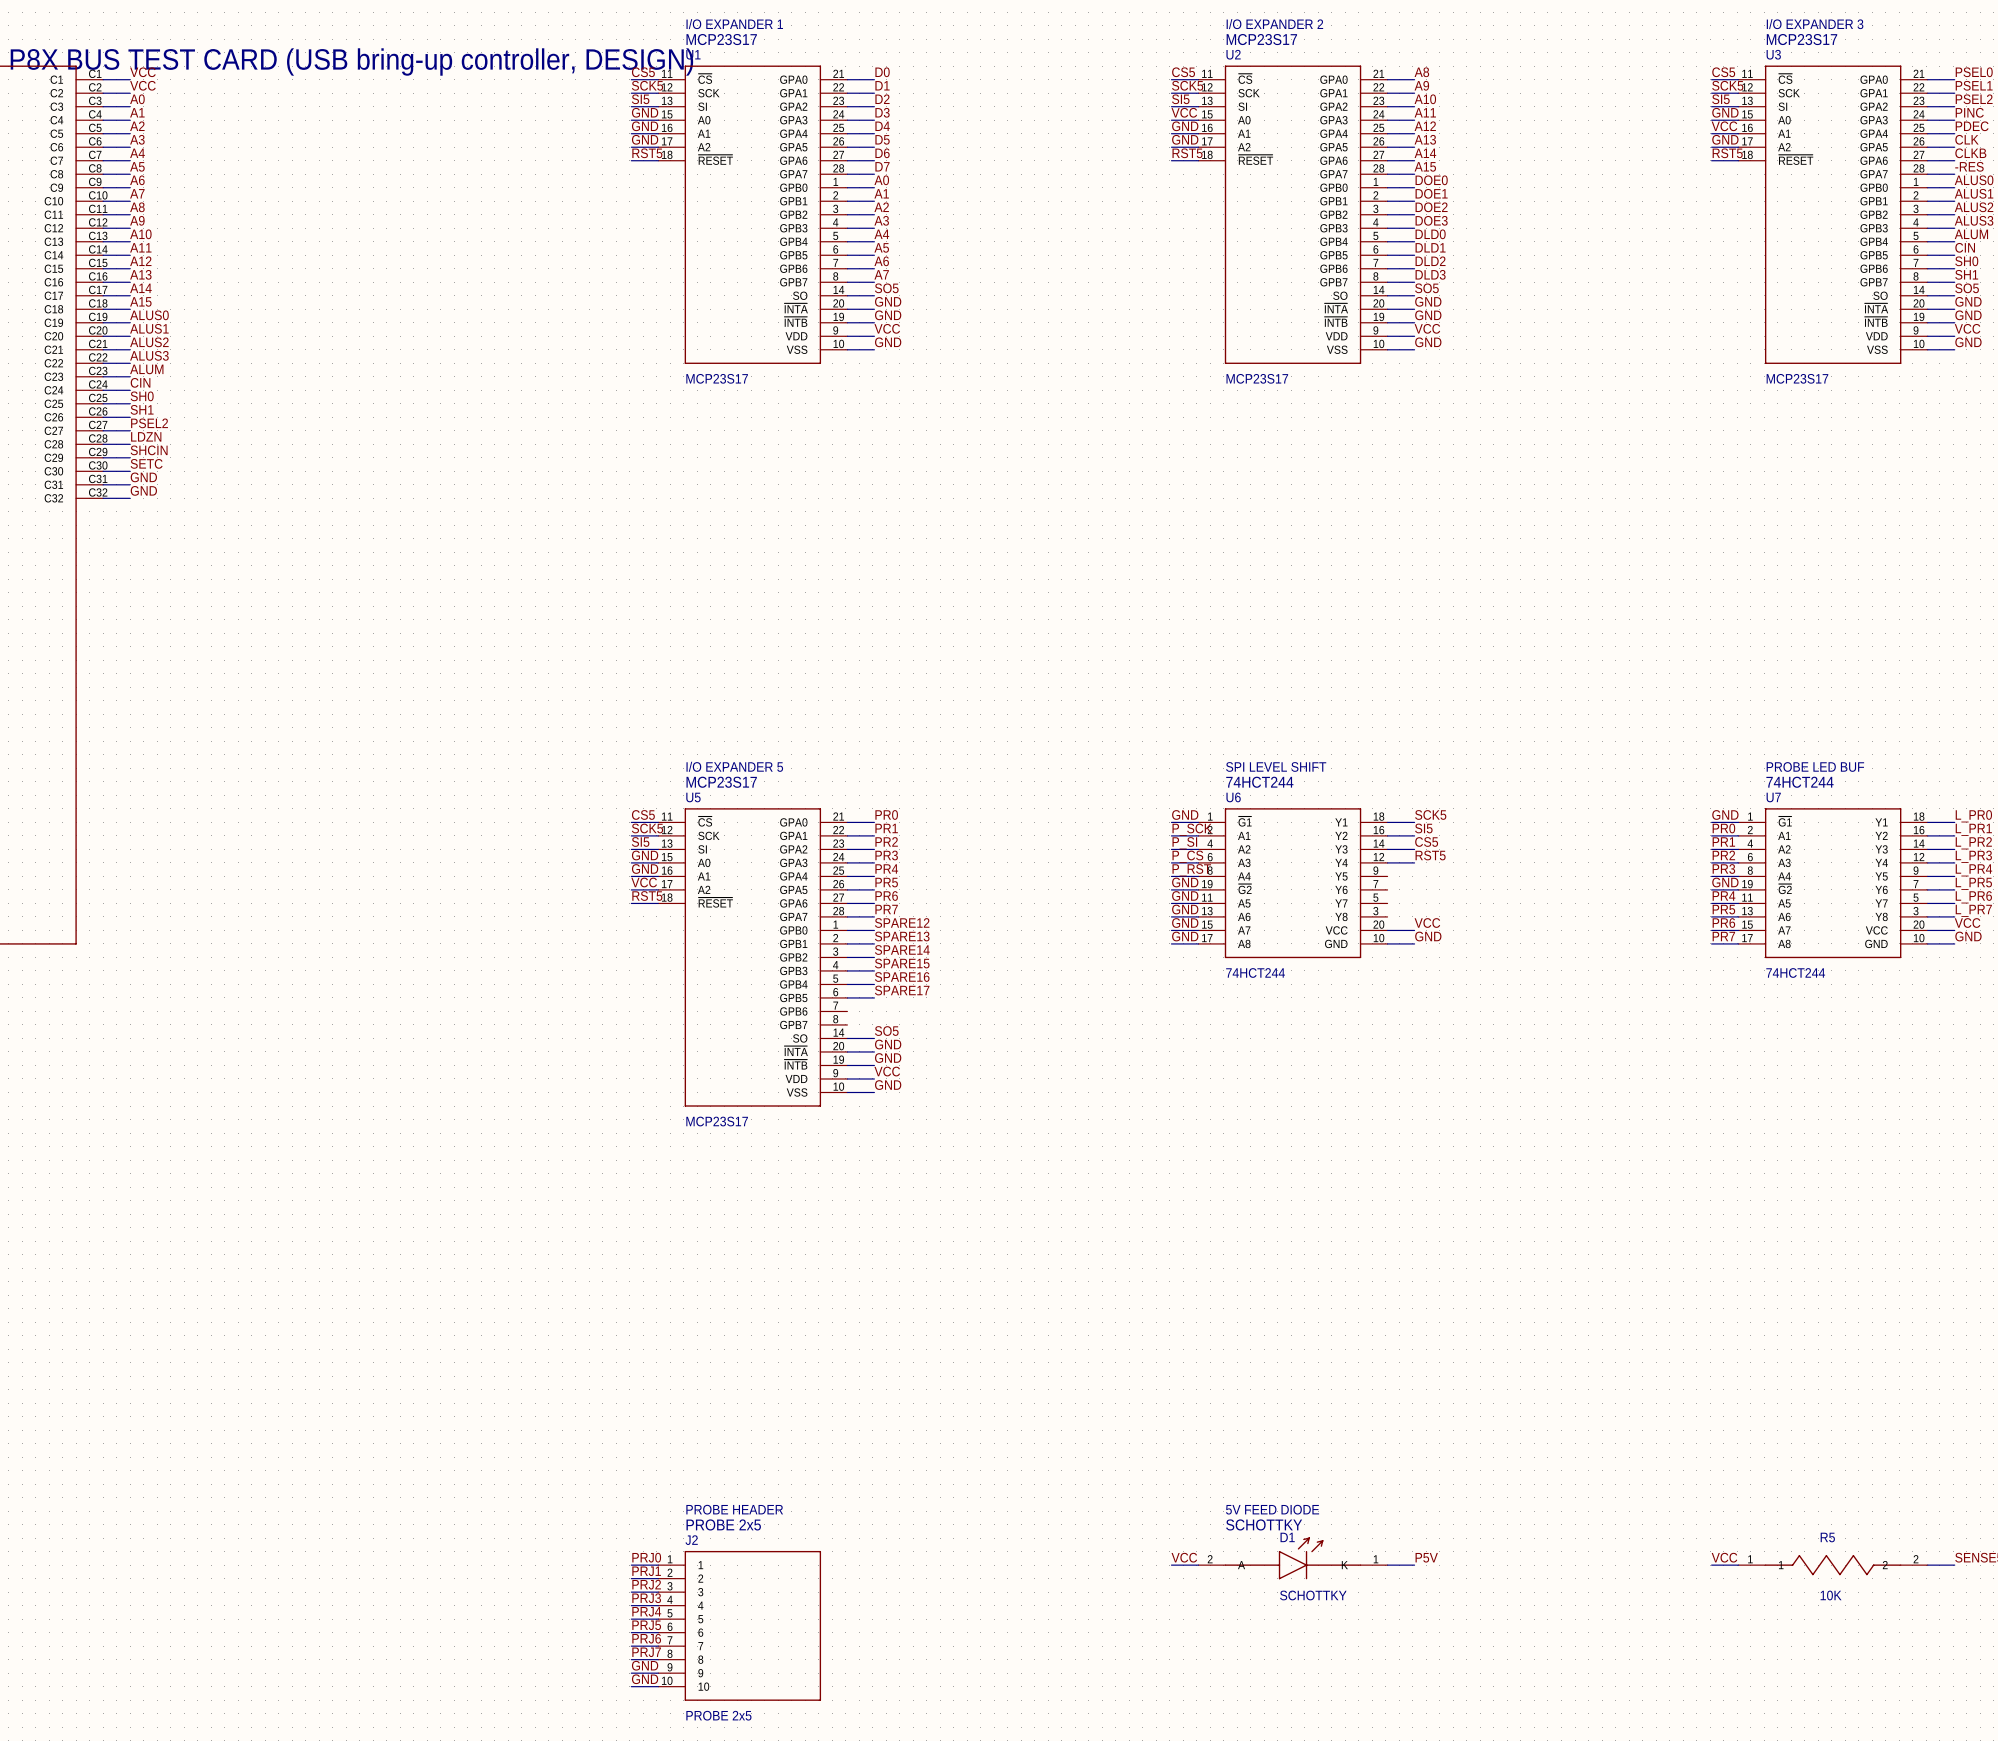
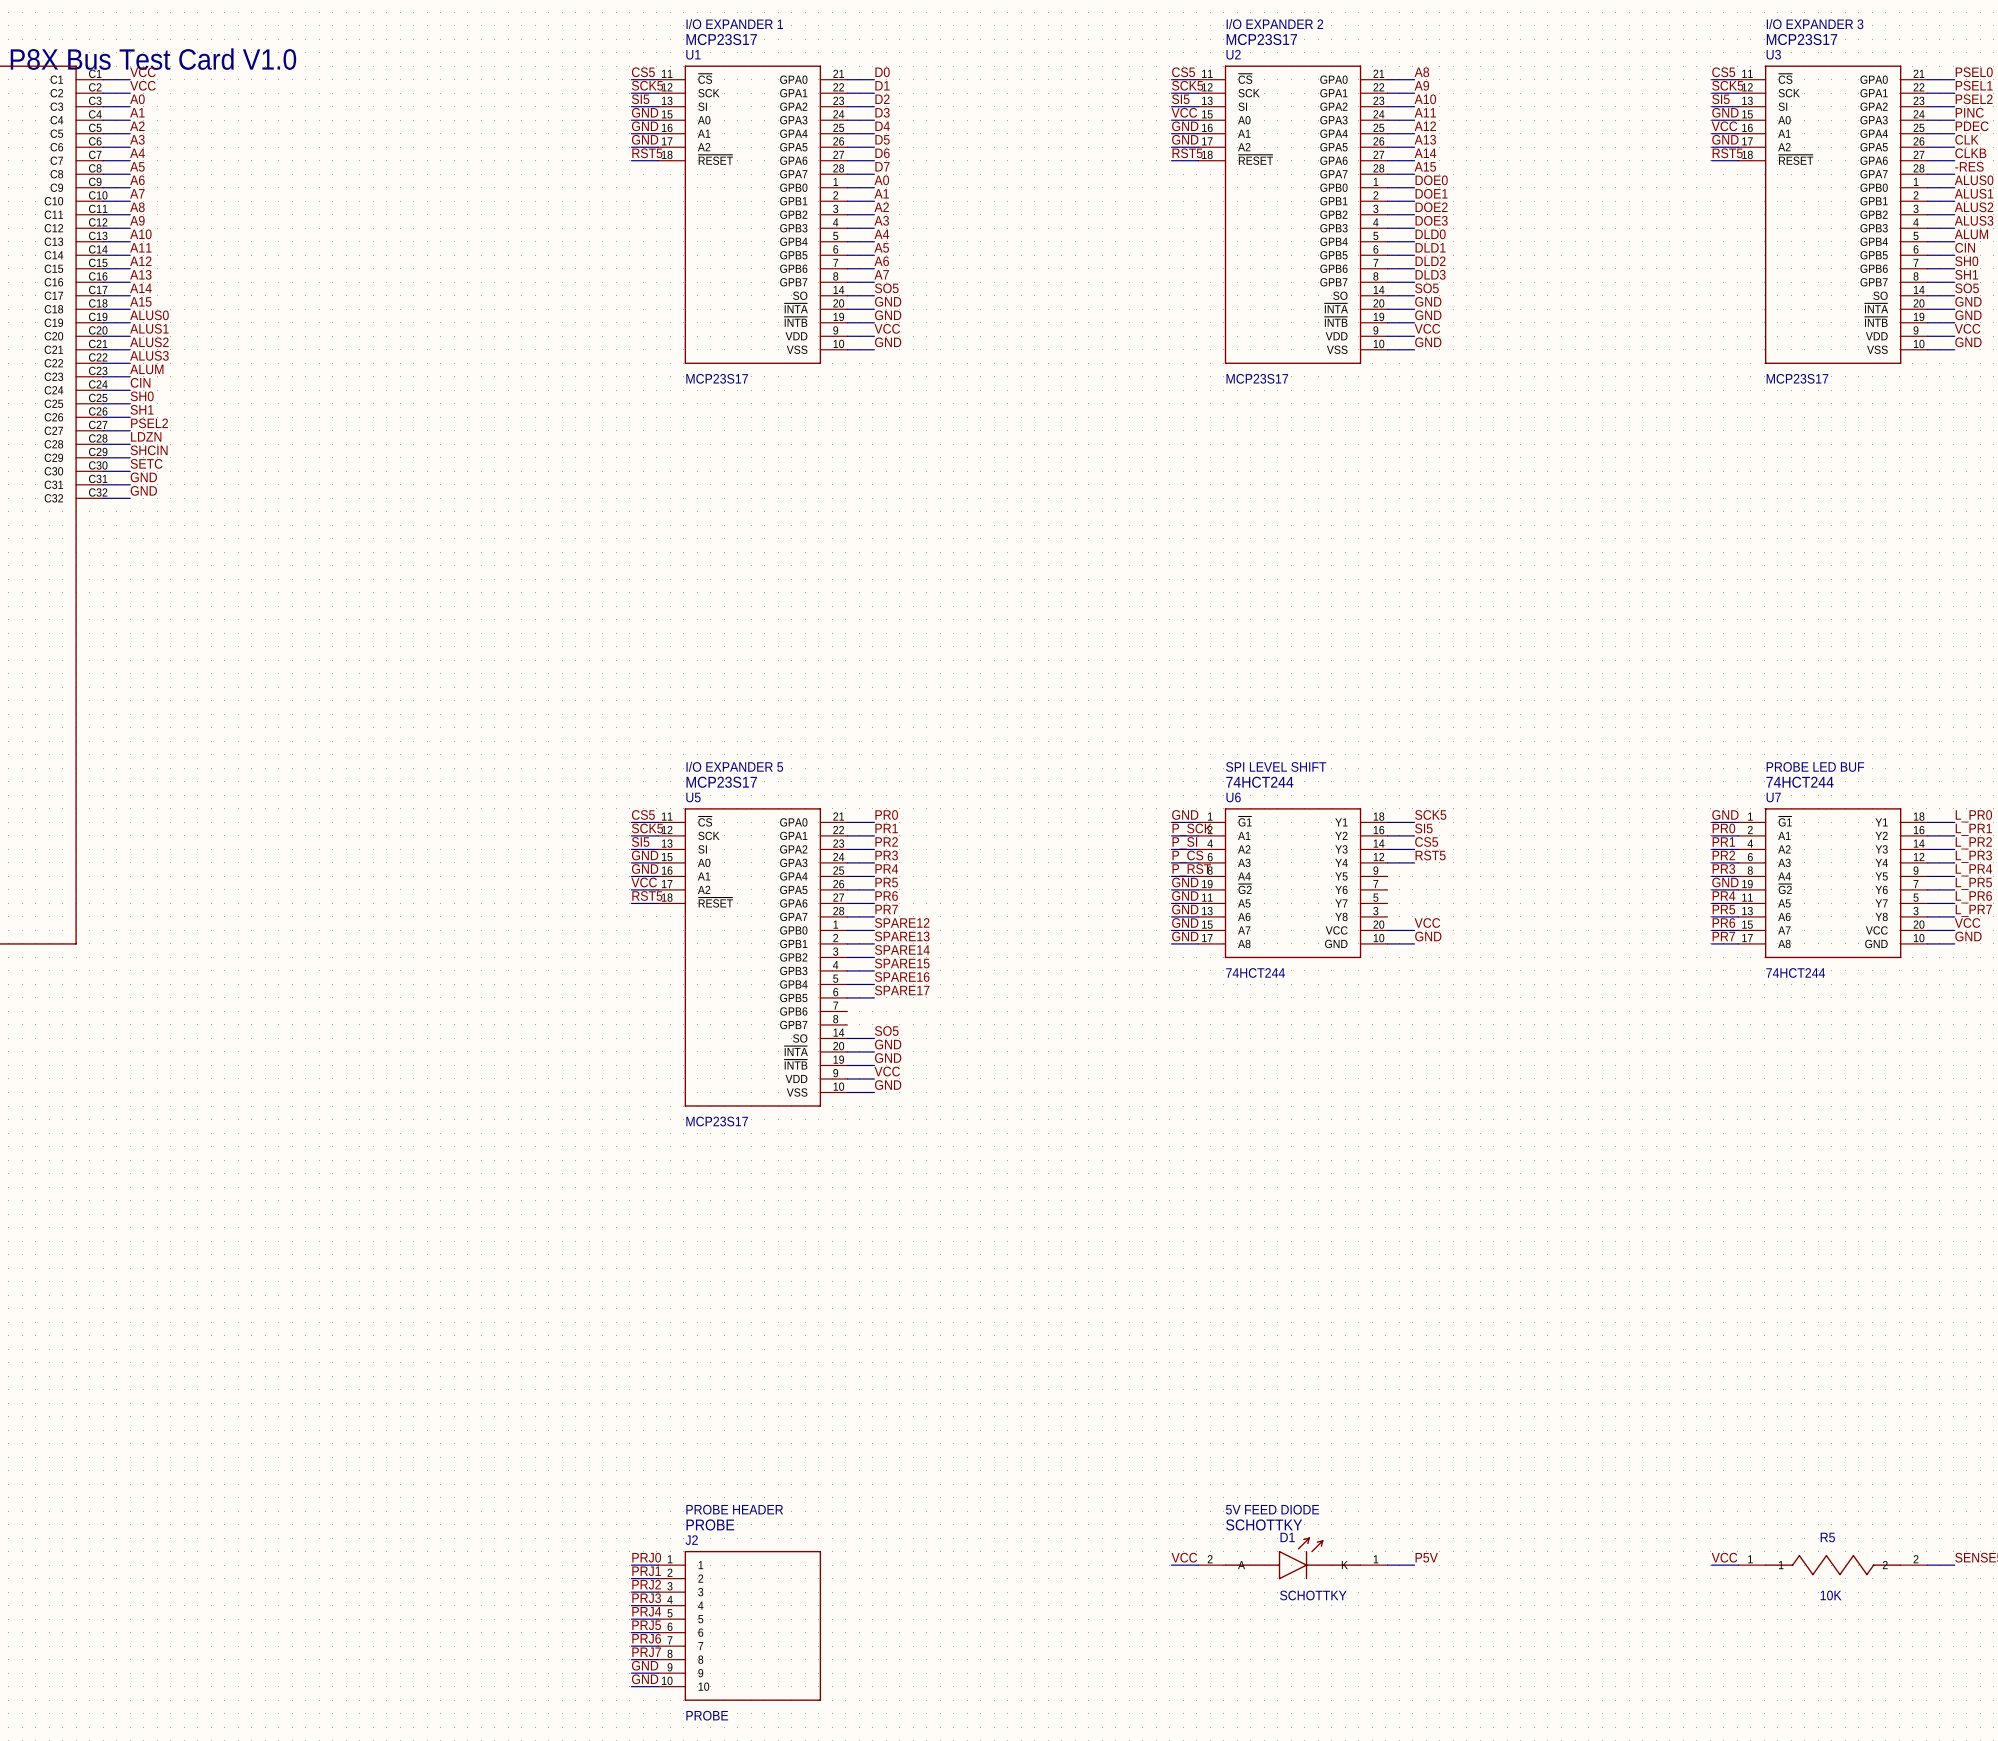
text: P8X BUS TEST CARD (USB bring-up controller, DESIGN) (351, 61) -> P8X Bus Test Card V1.0 (153, 59)
text: PROBE 2x5 (723, 1524) -> PROBE (710, 1524)
J2 value: PROBE 2x5 (718, 1715) -> PROBE (707, 1715)

